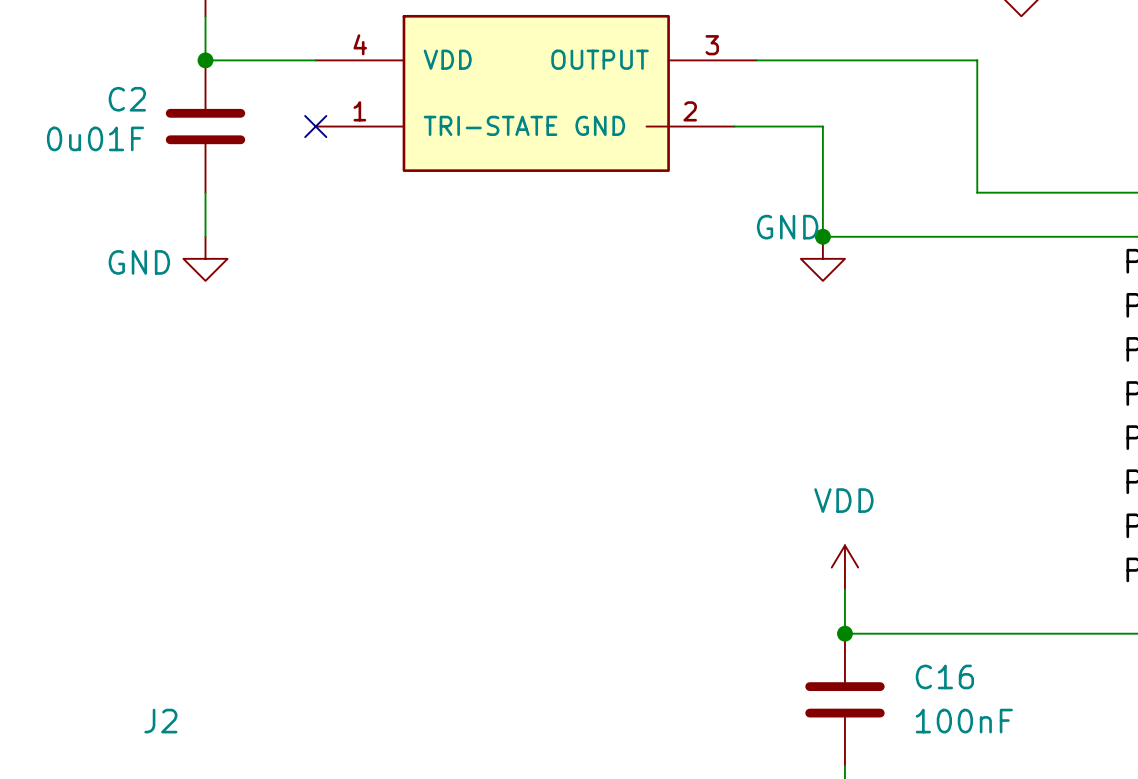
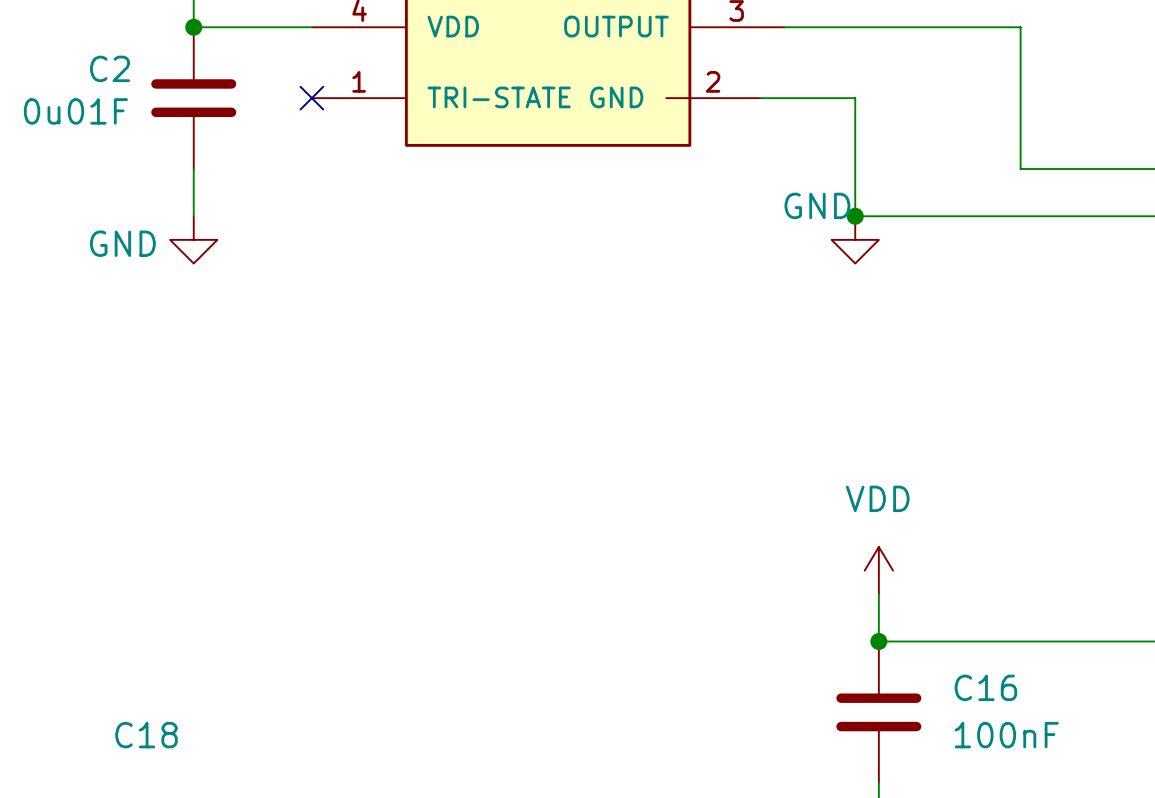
J2 name: J2 (160, 721) -> C18 (146, 735)

